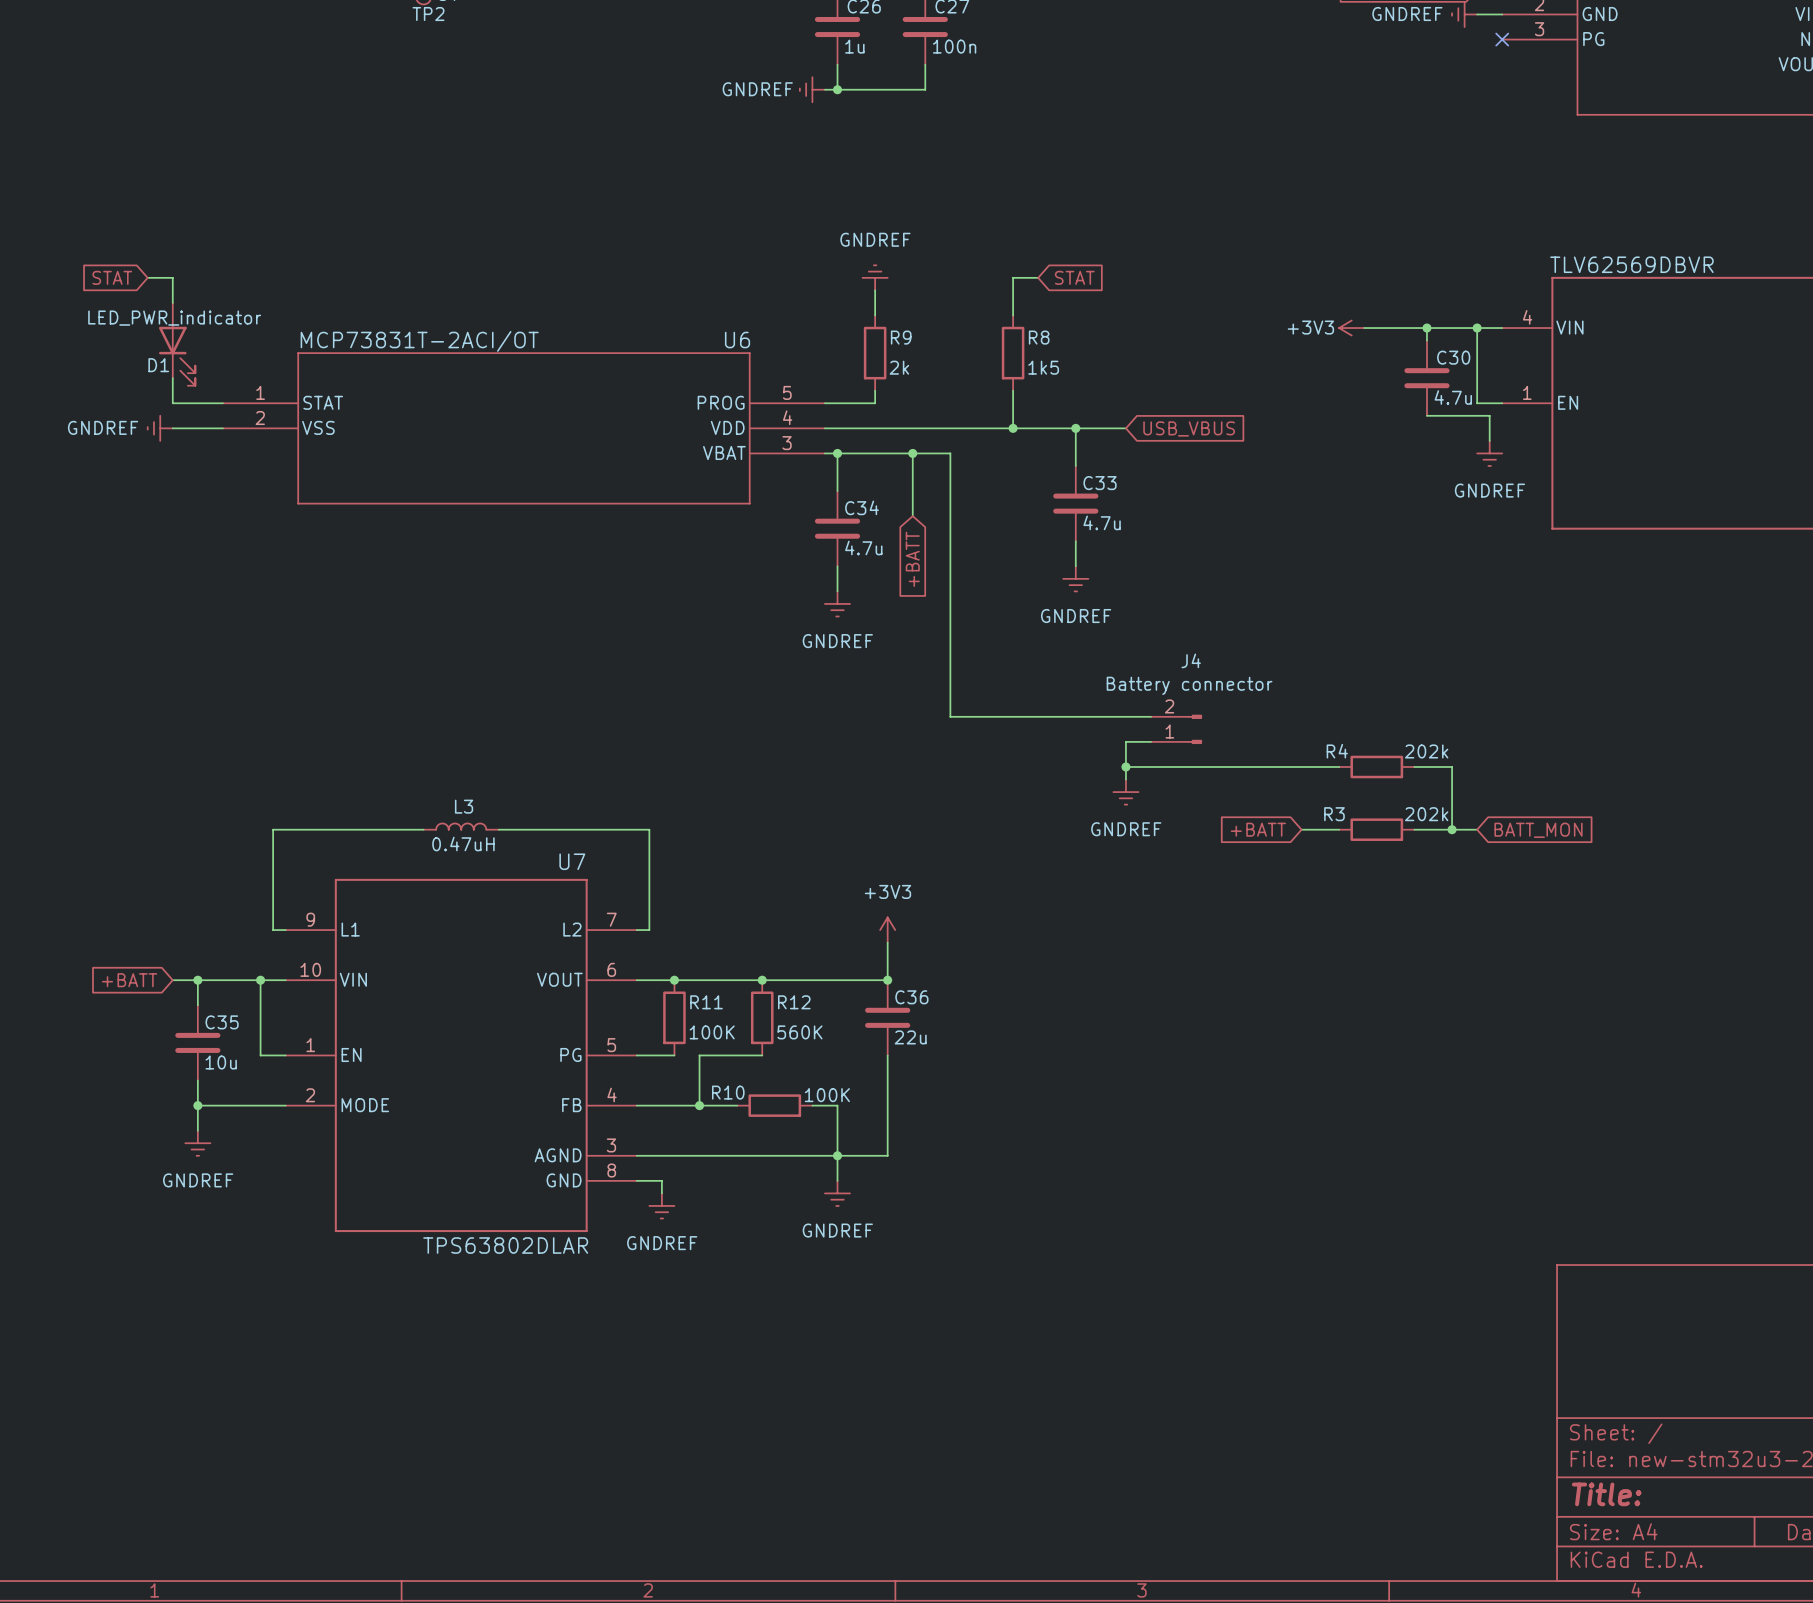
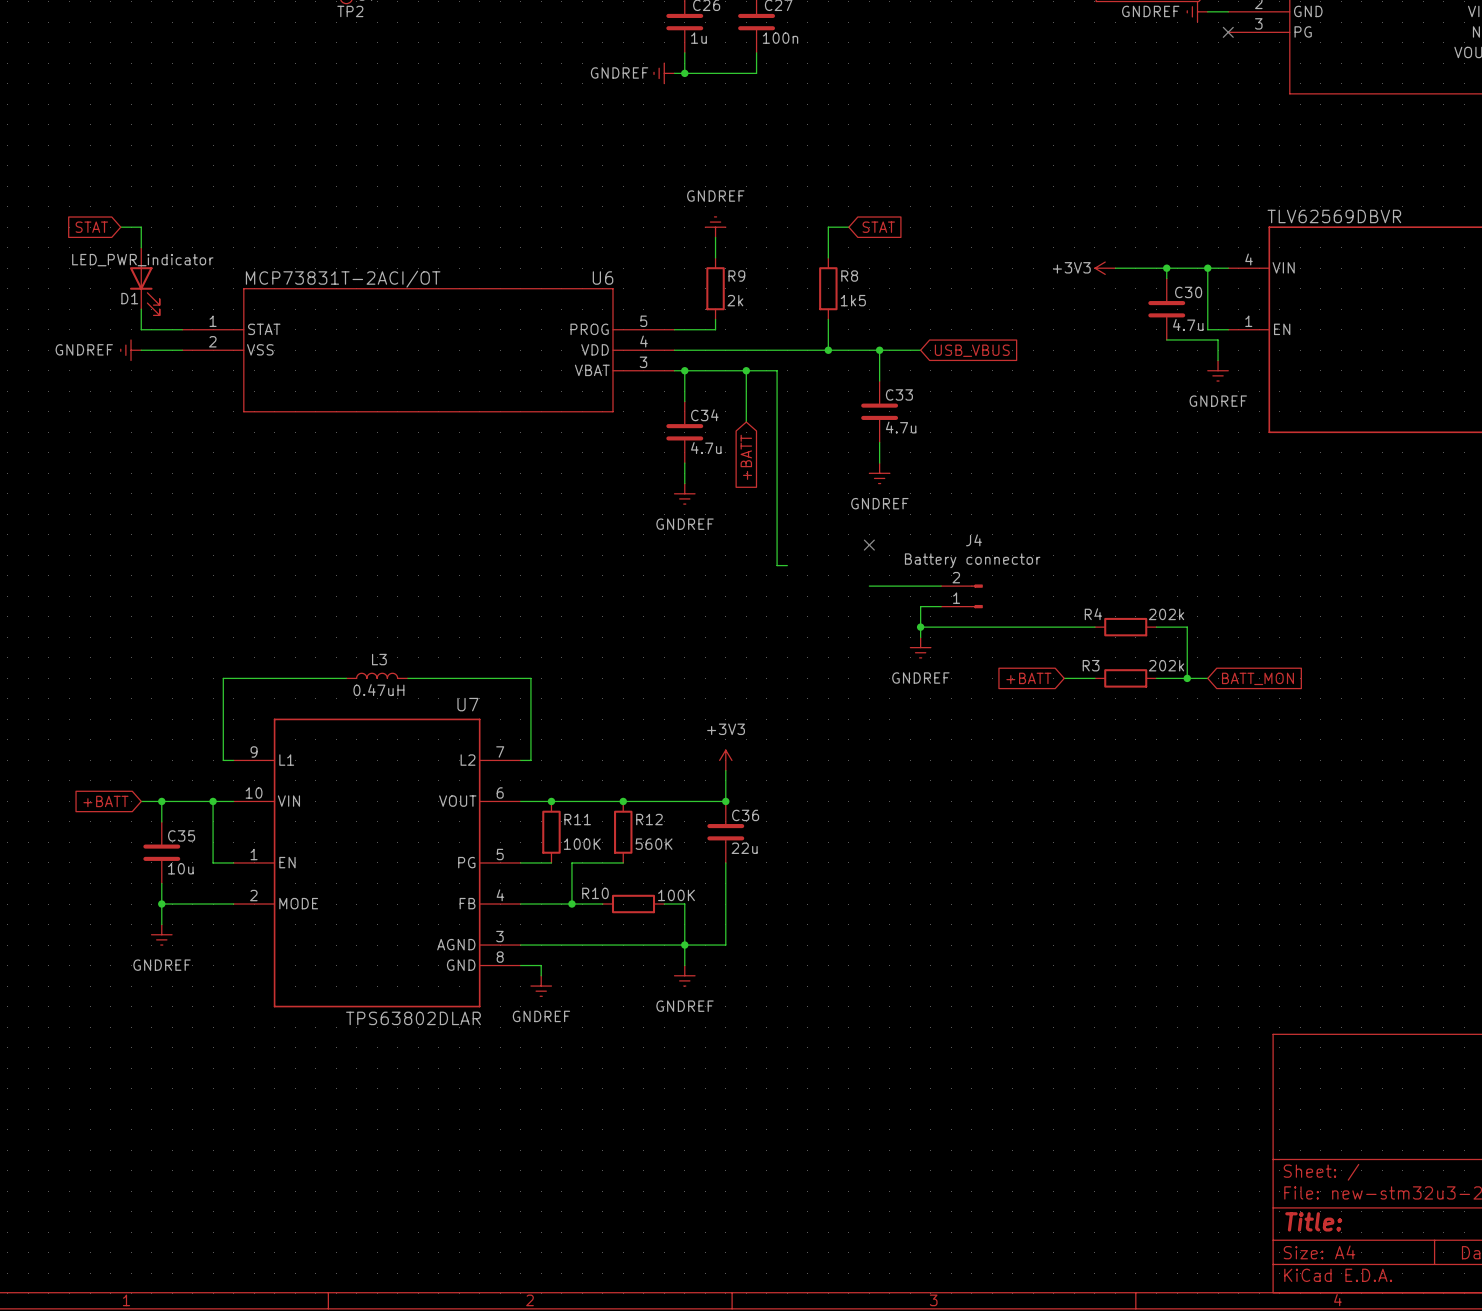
no-connect mark: none -> (869, 545)
wire: (950, 691) (950, 716) (1063, 716) -> (777, 565) (787, 565)

